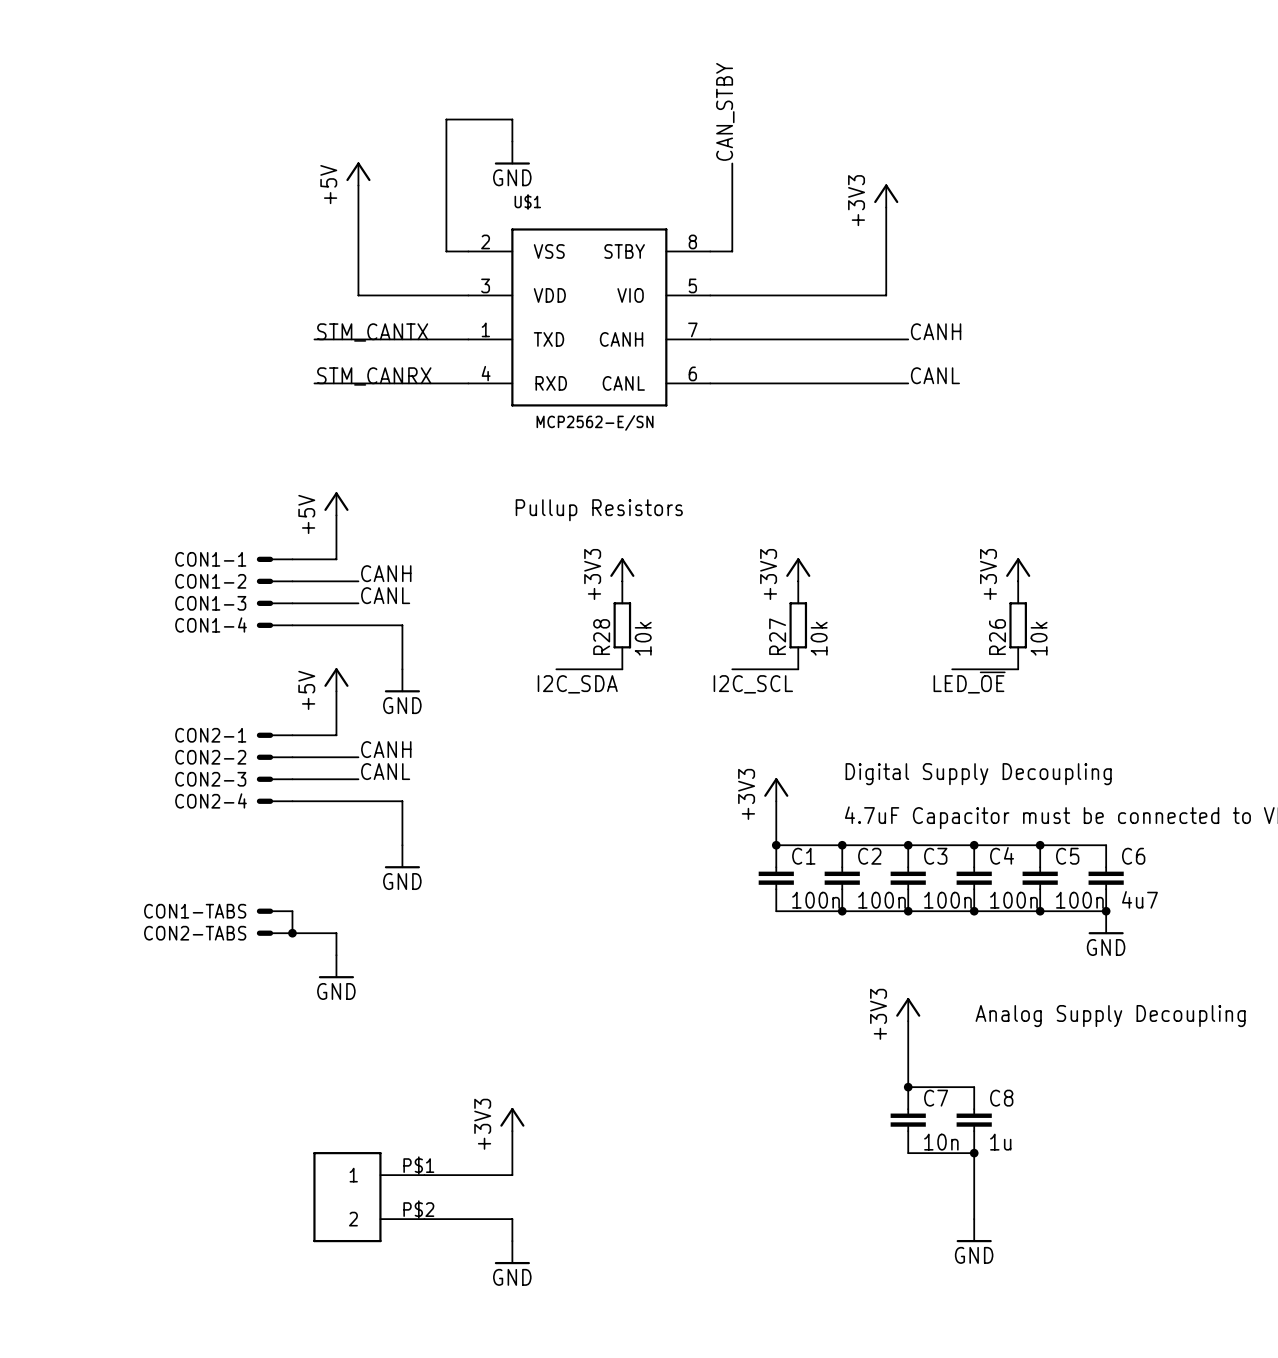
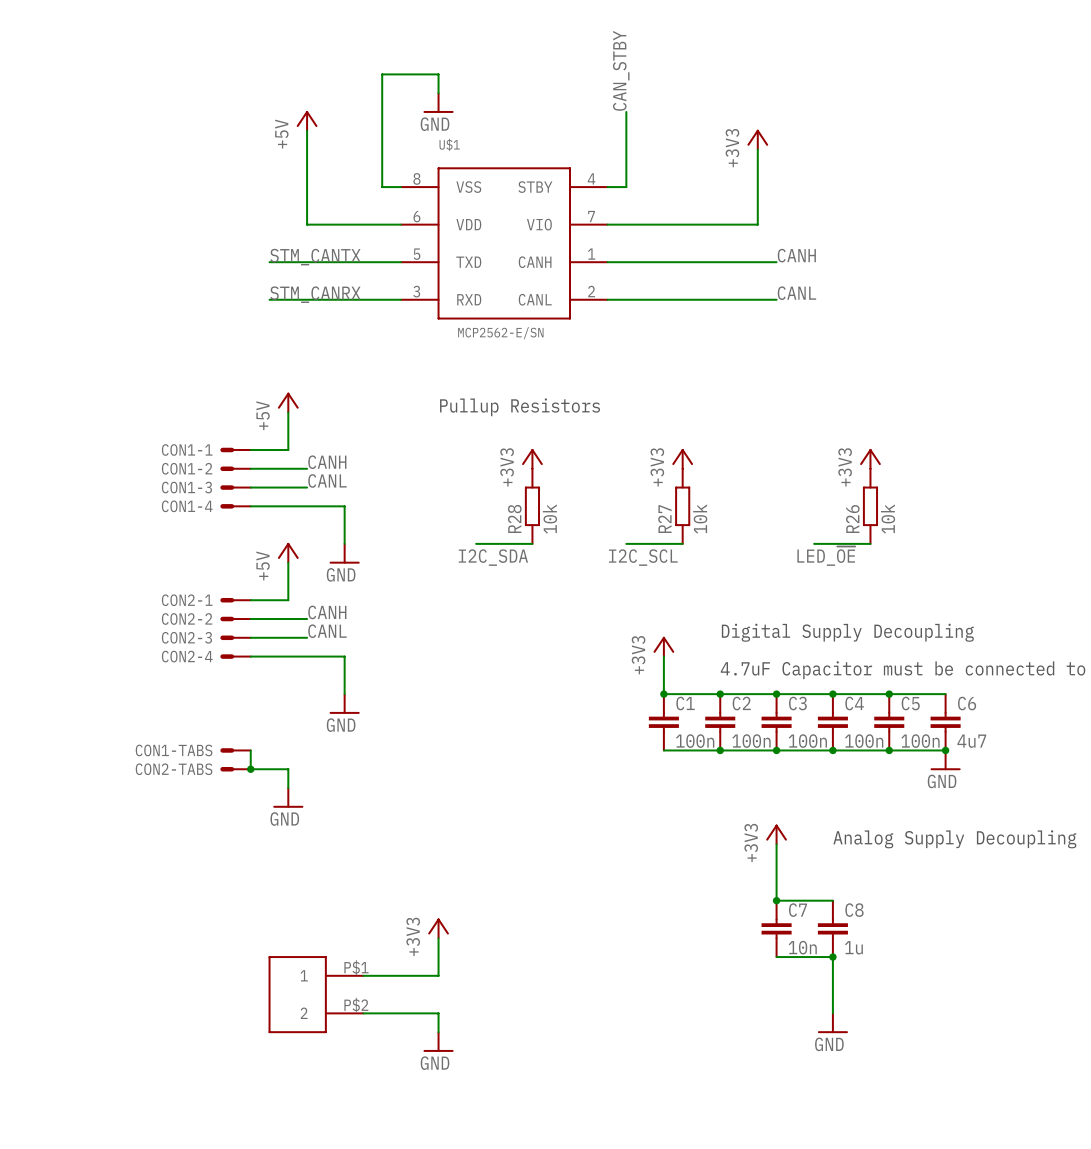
U$1 pin number: 2 (485, 241) -> 8 (416, 178)
U$1 pin number: 8 (692, 241) -> 4 (591, 178)
U$1 pin number: 3 (485, 285) -> 6 (416, 216)
U$1 pin number: 5 (692, 285) -> 7 (591, 216)
U$1 pin number: 1 (485, 329) -> 5 (417, 254)
U$1 pin number: 7 (692, 329) -> 1 (591, 254)
U$1 pin number: 4 (486, 373) -> 3 (416, 291)
U$1 pin number: 6 (692, 373) -> 2 (591, 291)

